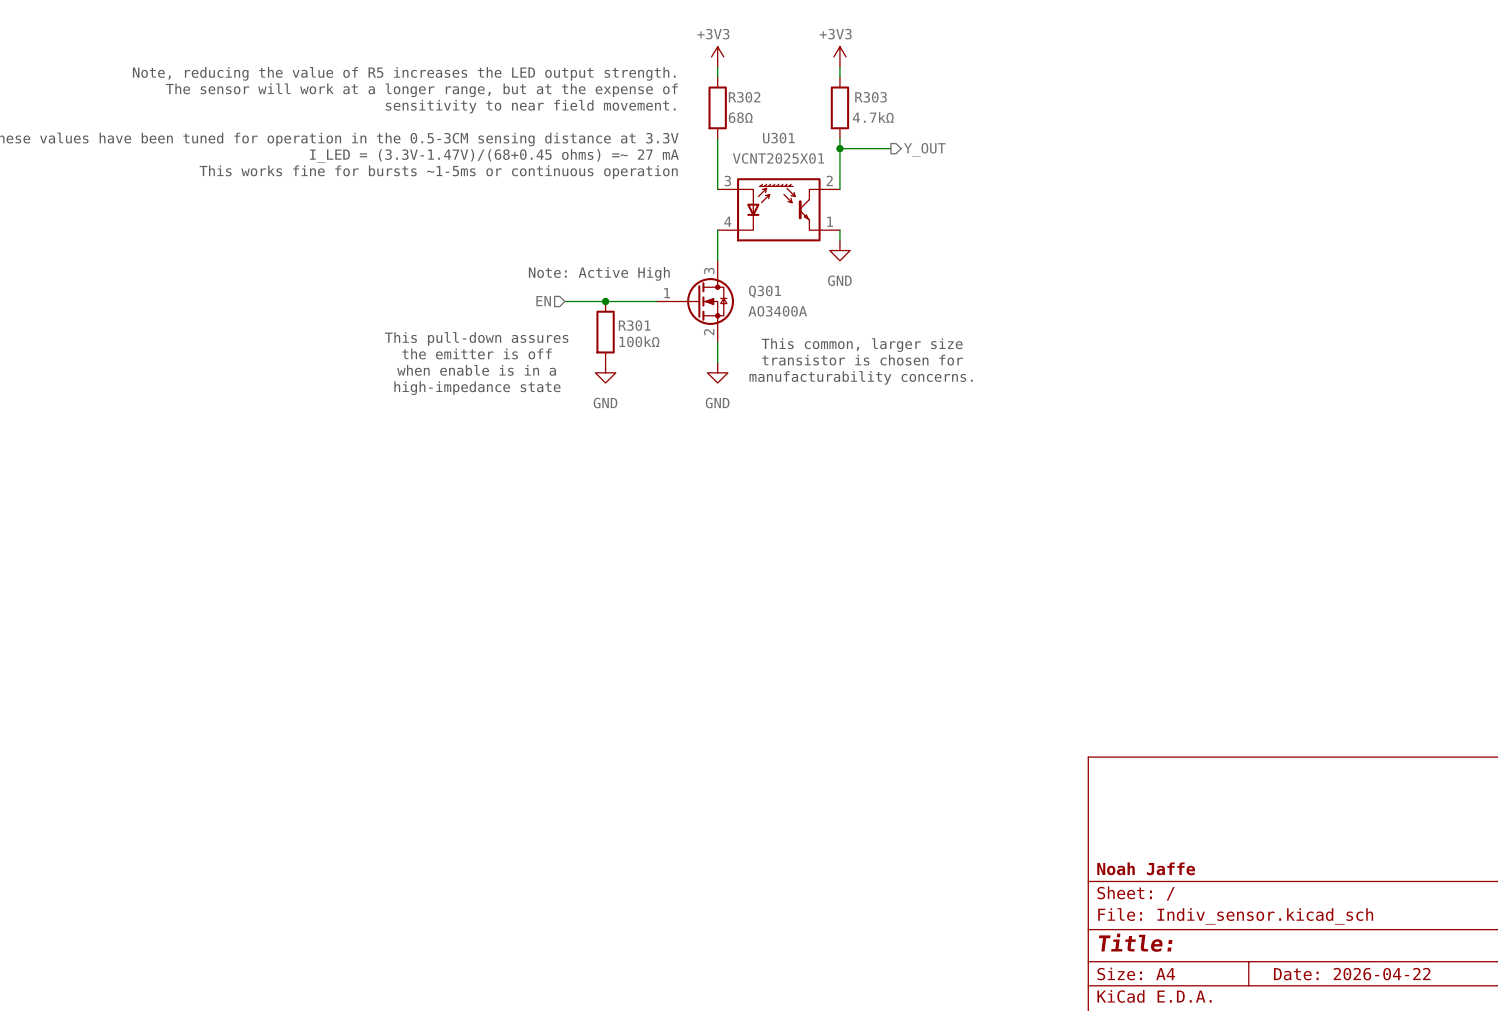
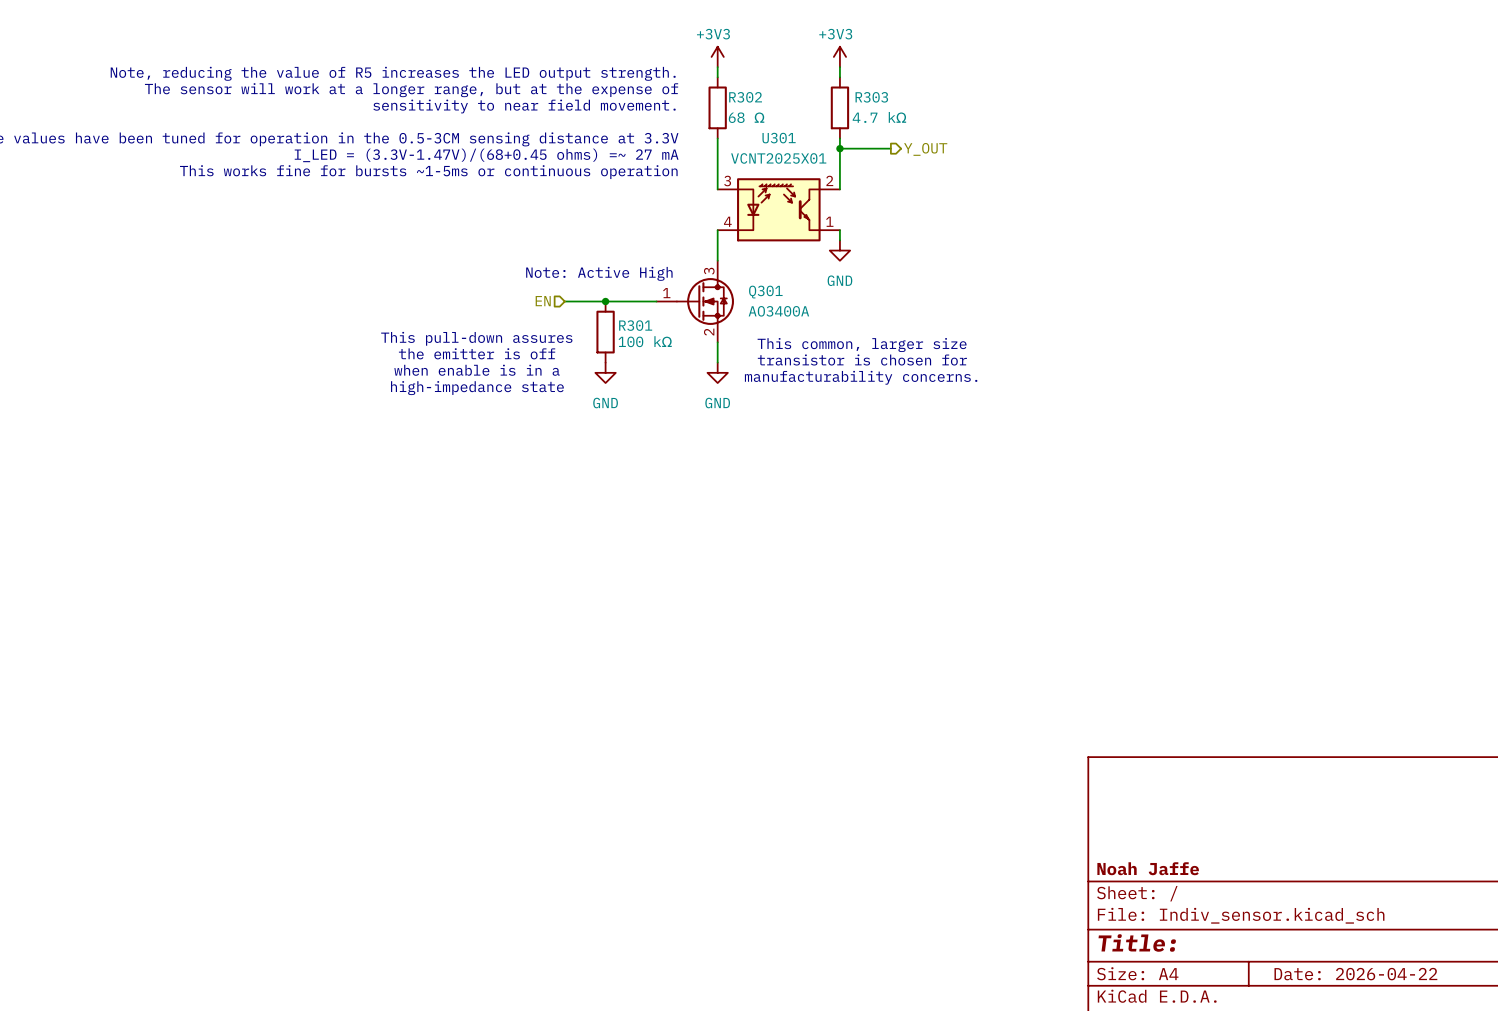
R302 value: 68Ω (740, 117) -> 68 Ω (746, 117)
R303 value: 4.7kΩ (873, 117) -> 4.7 kΩ (879, 117)
R301 value: 100kΩ (639, 341) -> 100 kΩ (645, 341)

